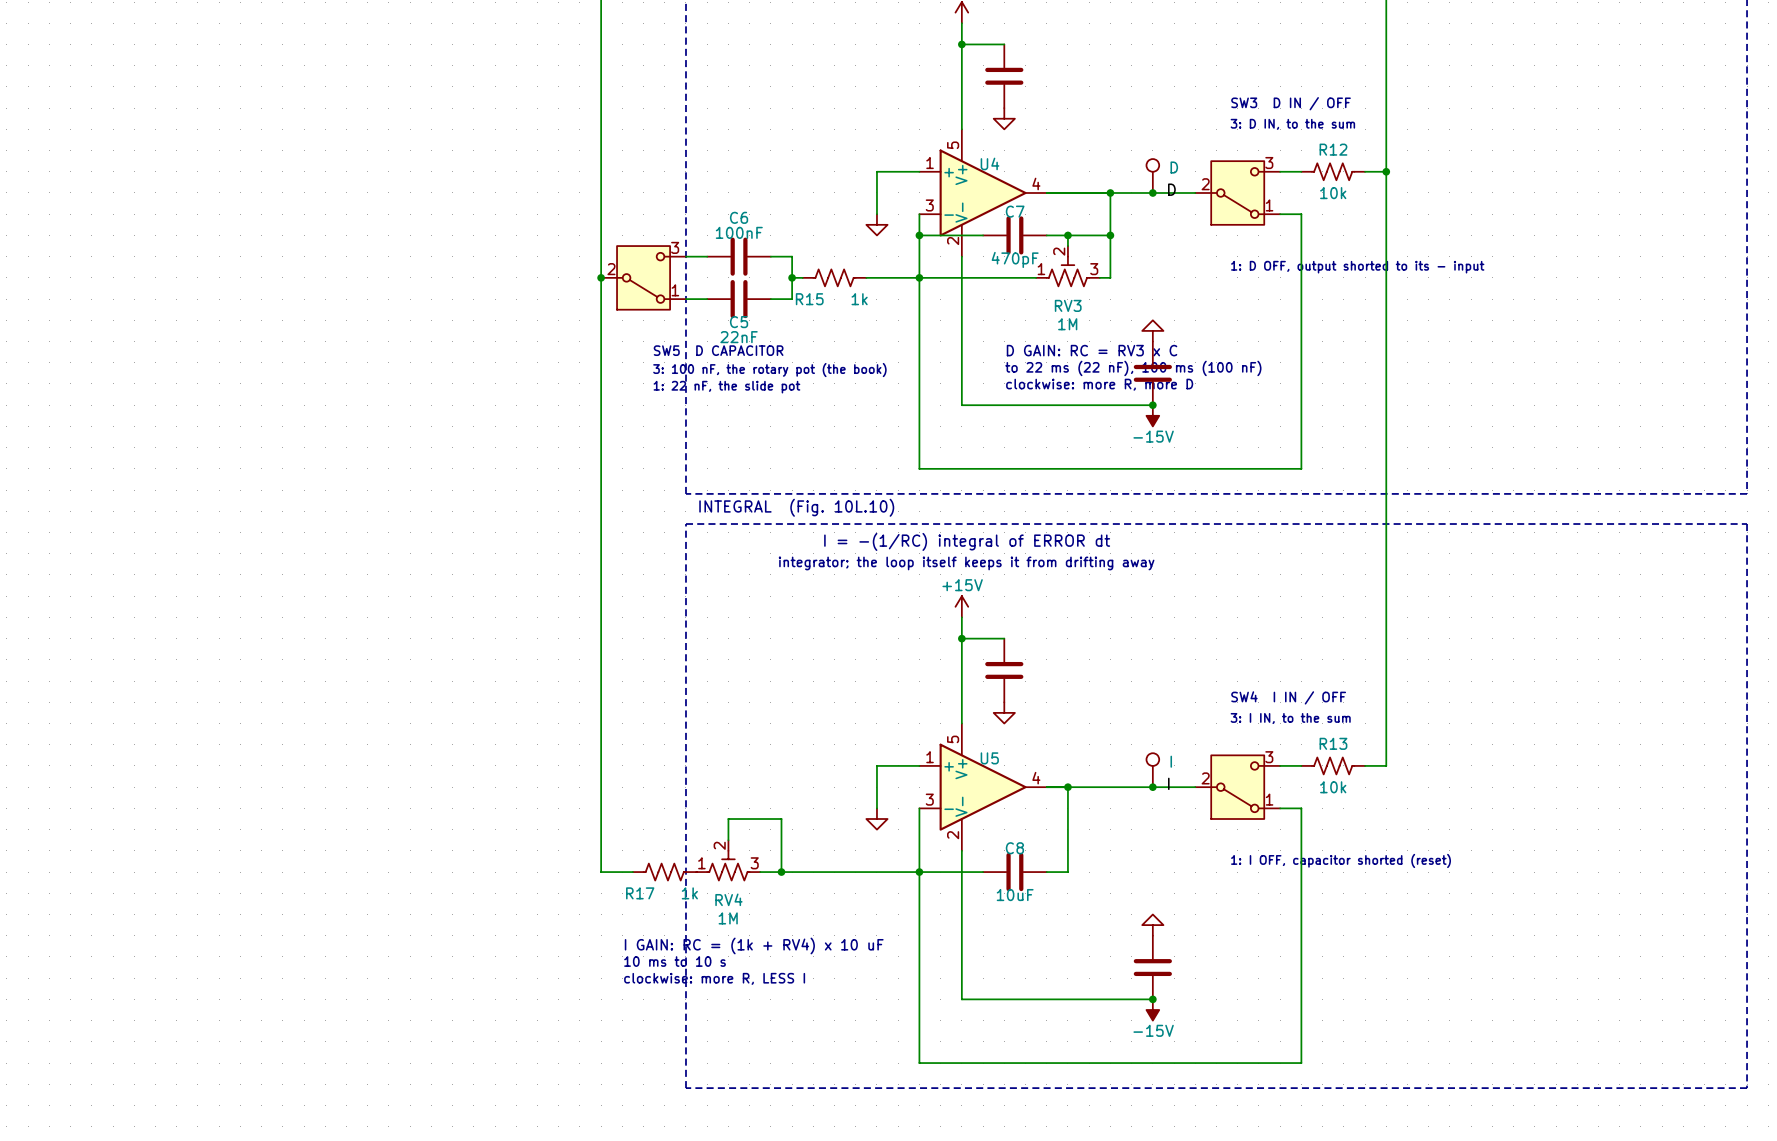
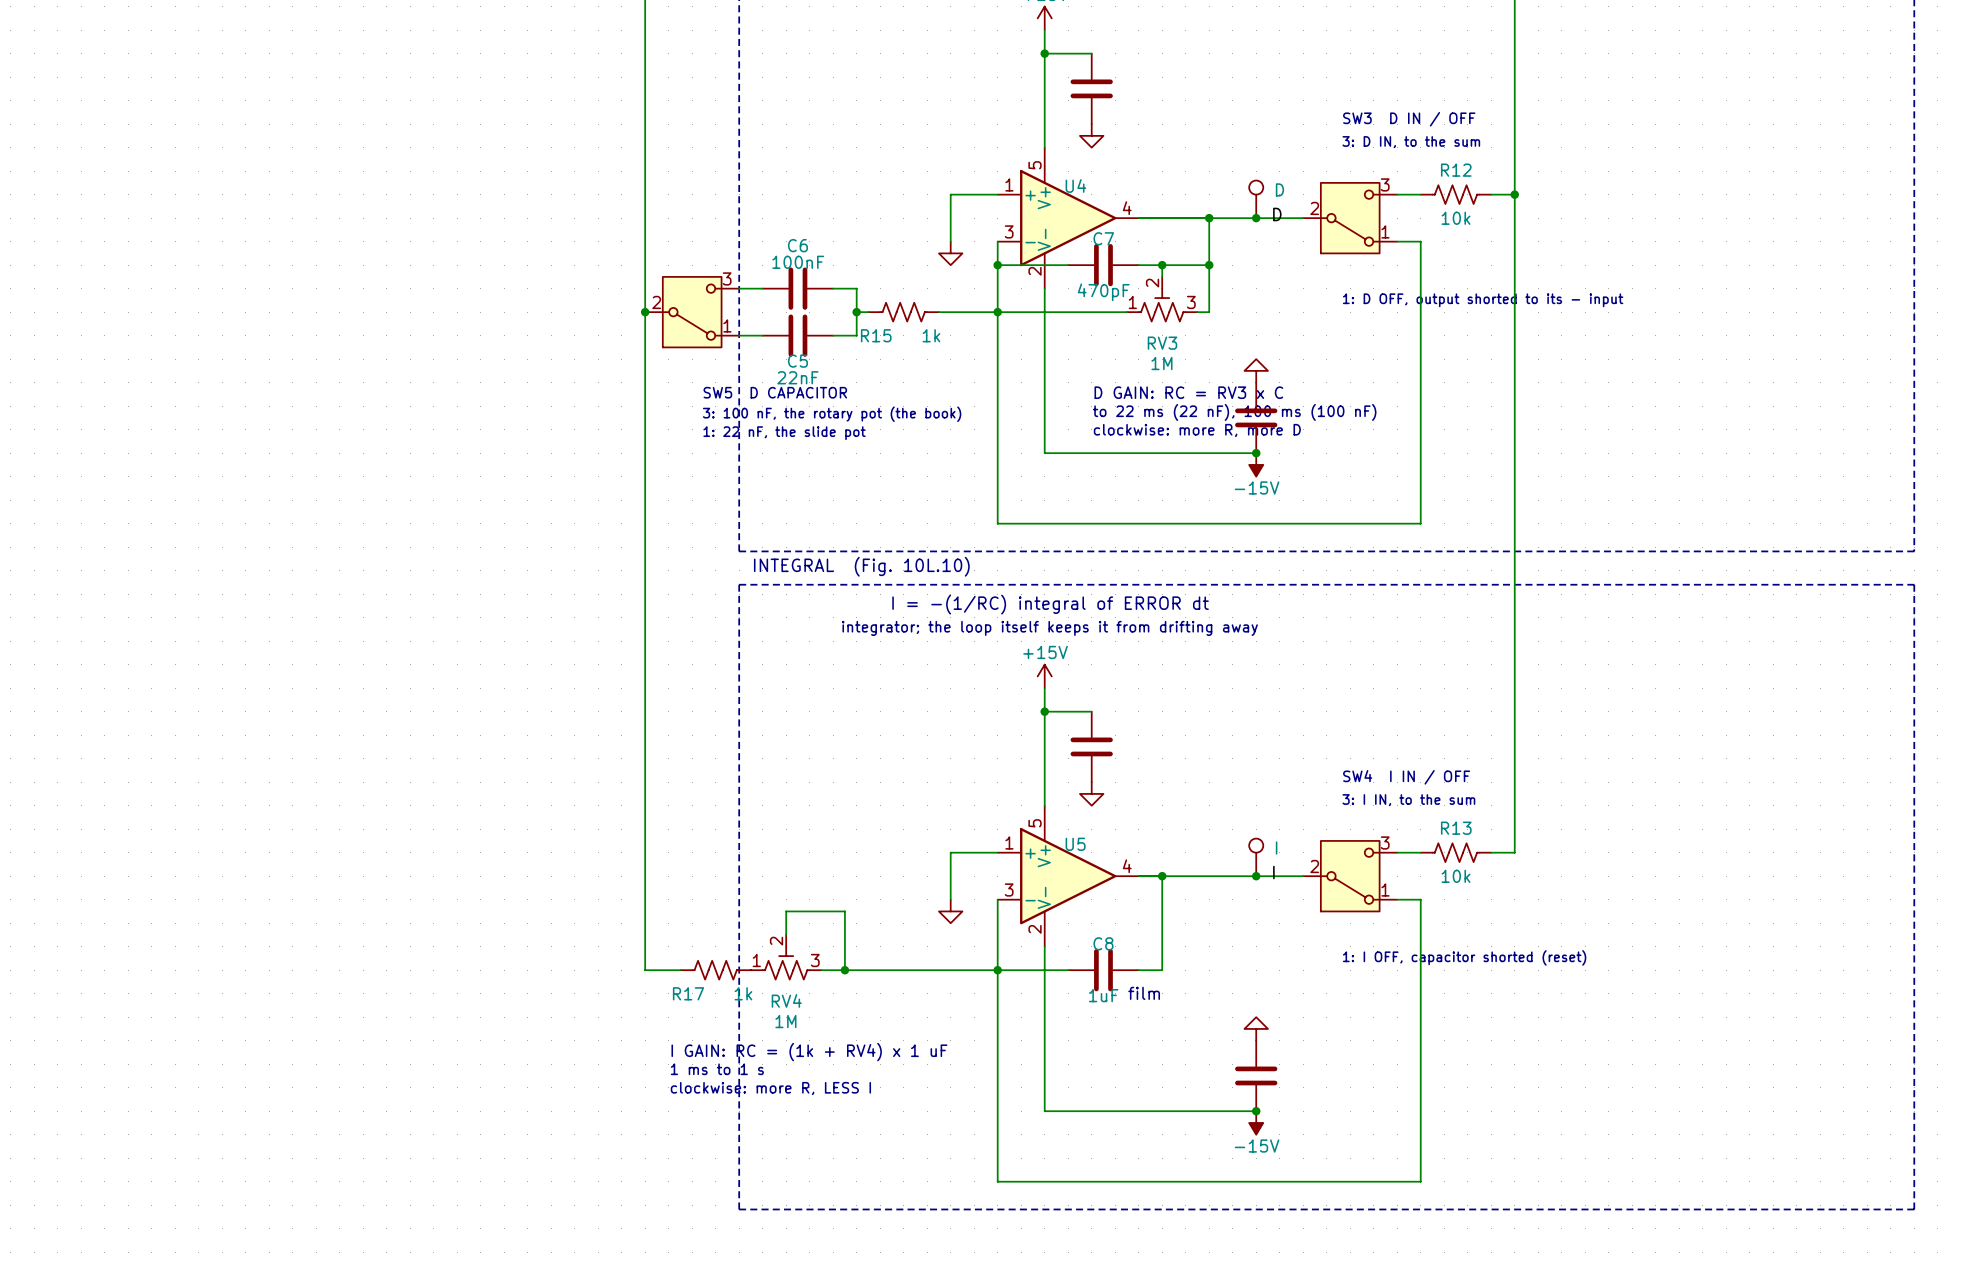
text: none -> film (1144, 993)
C8 value: 10uF (1015, 895) -> 1uF (1103, 995)
text: I GAIN: RC = (1k + RV4) x 10 uF (754, 945) -> I GAIN: RC = (1k + RV4) x 1 uF (809, 1052)
text: 10 ms to 10 s (675, 961) -> 1 ms to 1 s (717, 1069)

